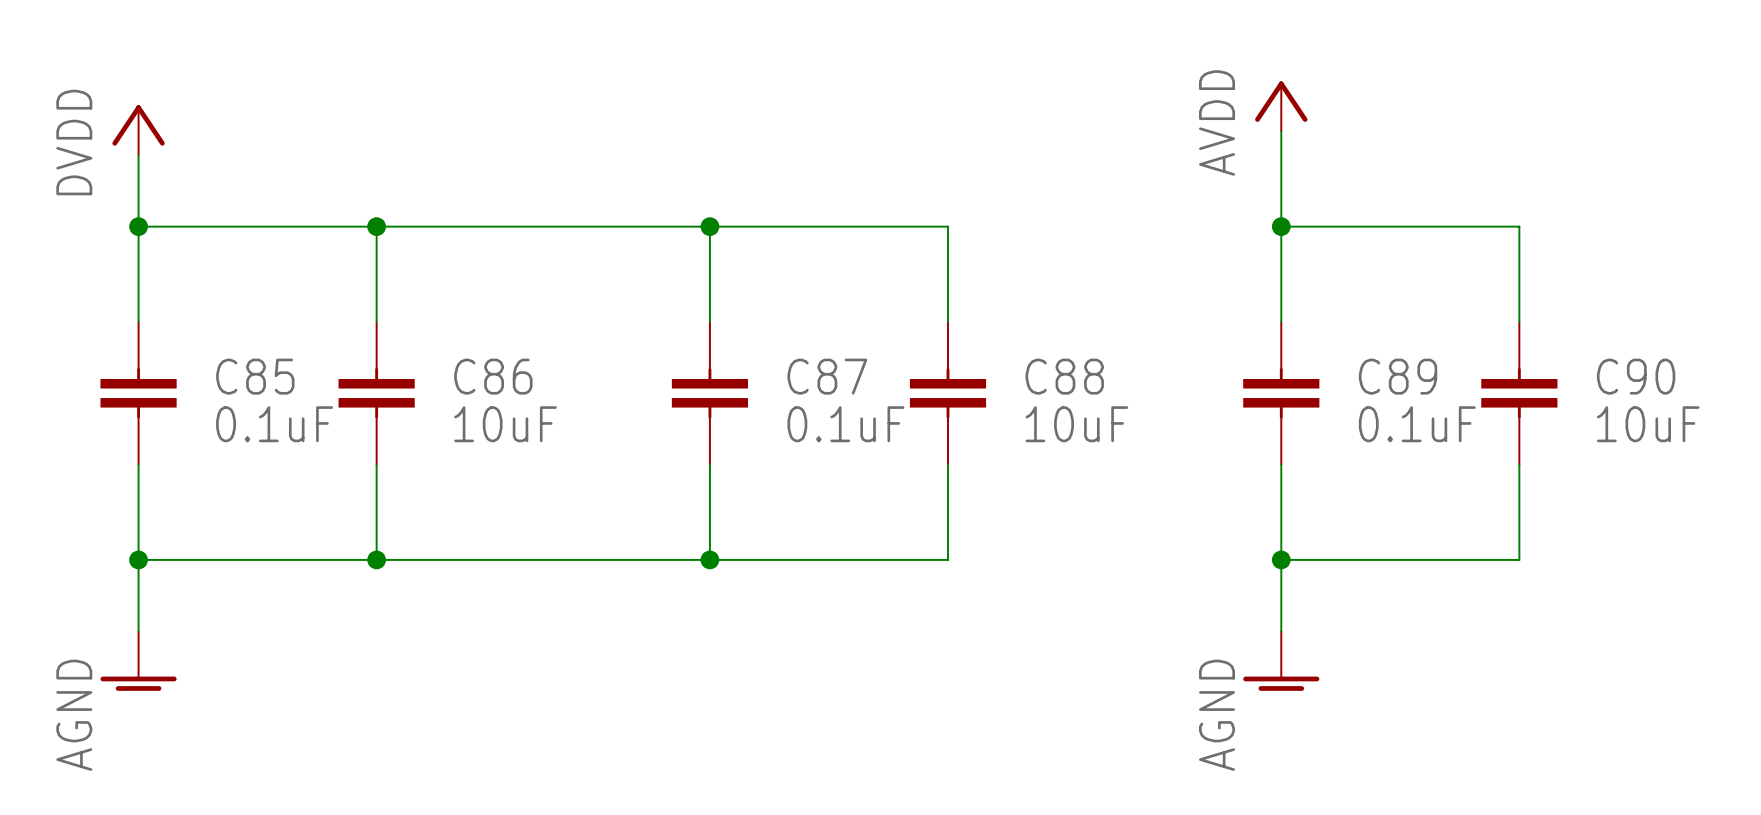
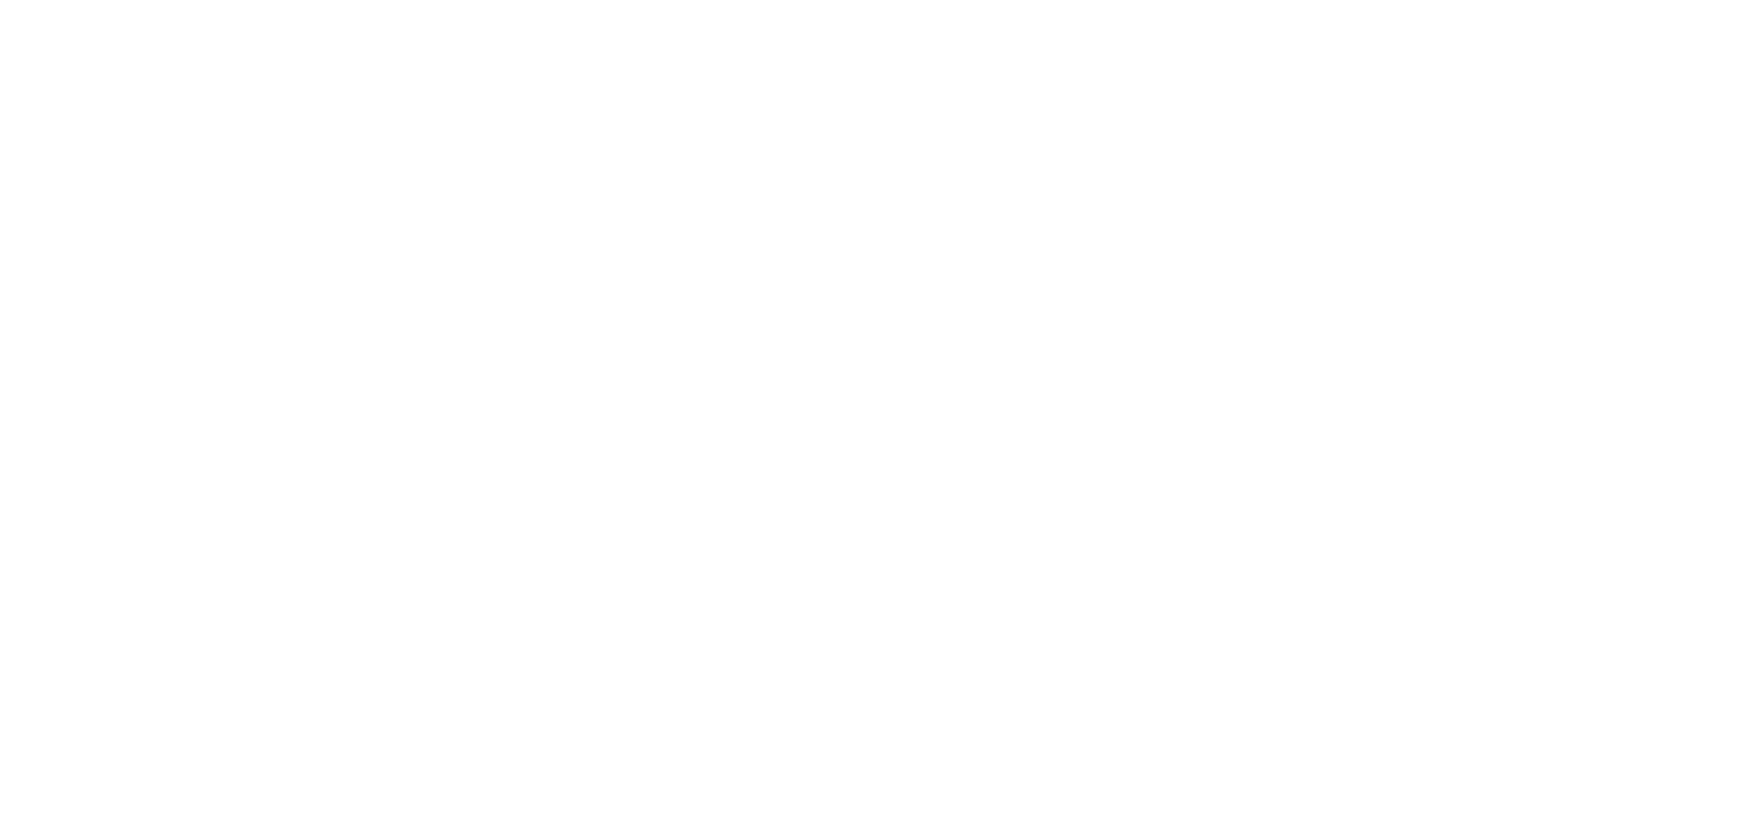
power symbol: AVDD (1281, 106) -> none
power symbol: DVDD (138, 130) -> none
wire: (1281, 131) (1281, 321) -> none
wire: (138, 155) (138, 321) -> none
wire: (138, 226) (947, 226) (947, 321) -> none
junction: (138, 226) -> none
wire: (376, 226) (376, 321) -> none
junction: (376, 226) -> none
wire: (709, 226) (709, 321) -> none
junction: (709, 226) -> none
wire: (1281, 226) (1519, 226) (1519, 321) -> none
junction: (1281, 226) -> none
C85: 0.1uF (138, 393) -> none
C86: 10uF (376, 393) -> none
C87: 0.1uF (709, 393) -> none
C88: 10uF (947, 393) -> none
C89: 0.1uF (1281, 393) -> none
C90: 10uF (1519, 393) -> none
wire: (138, 464) (138, 631) -> none
wire: (376, 464) (376, 559) -> none
wire: (709, 464) (709, 559) -> none
wire: (947, 464) (947, 559) (138, 559) -> none
wire: (1281, 464) (1281, 631) -> none
wire: (1519, 464) (1519, 559) (1281, 559) -> none
junction: (138, 559) -> none
junction: (376, 559) -> none
junction: (709, 559) -> none
junction: (1281, 559) -> none
power symbol: AGND (138, 661) -> none
power symbol: AGND (1281, 661) -> none

